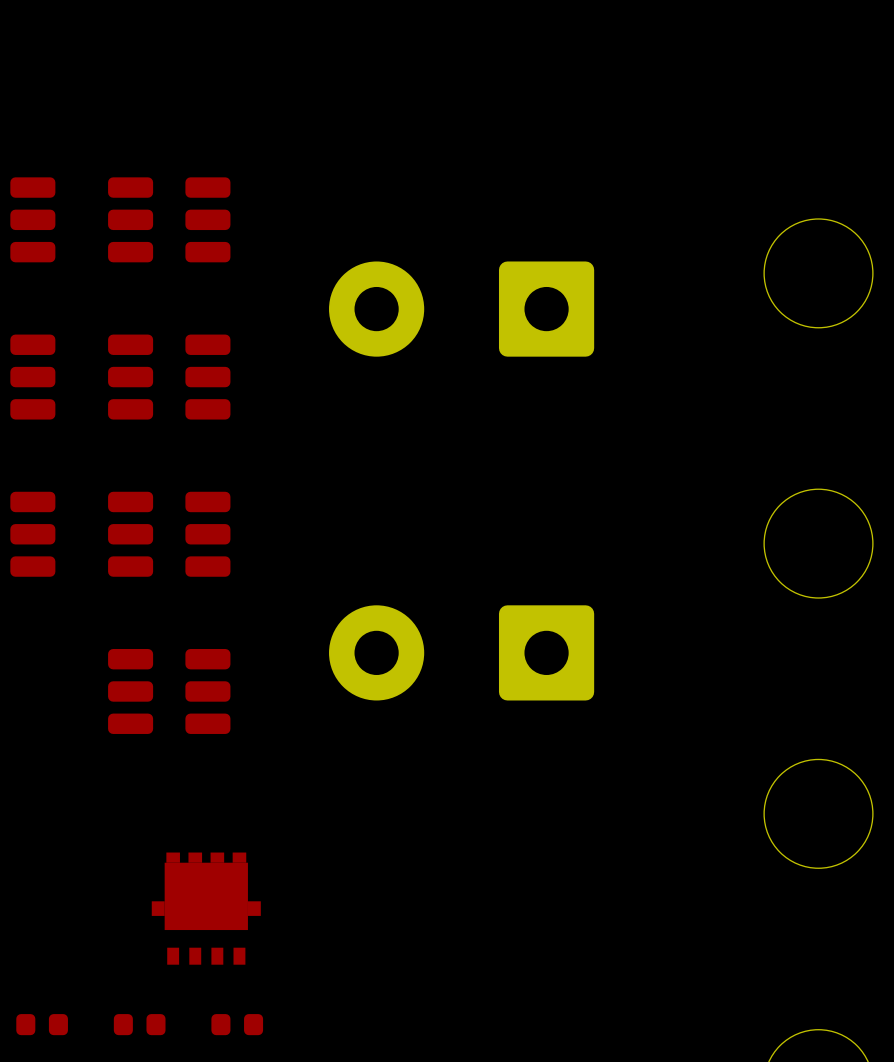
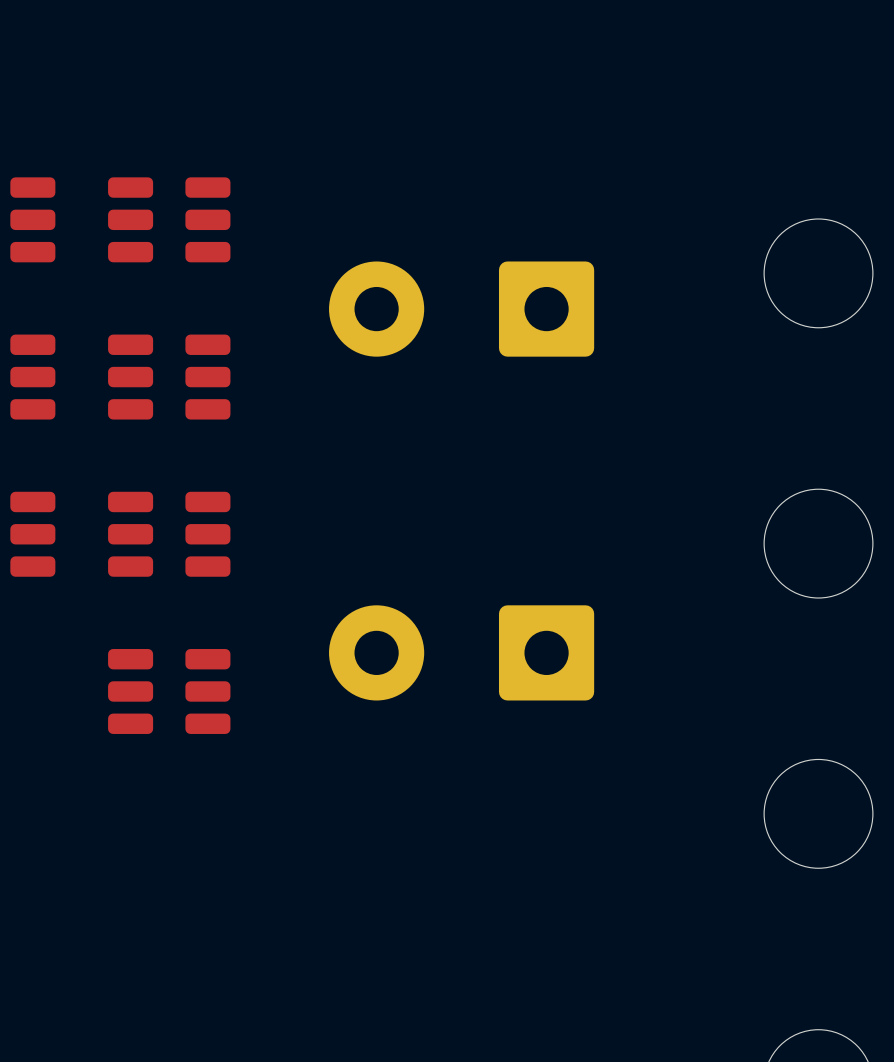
part: (206, 908) -> none
part: (42, 1024) -> none
part: (139, 1024) -> none
part: (237, 1024) -> none

